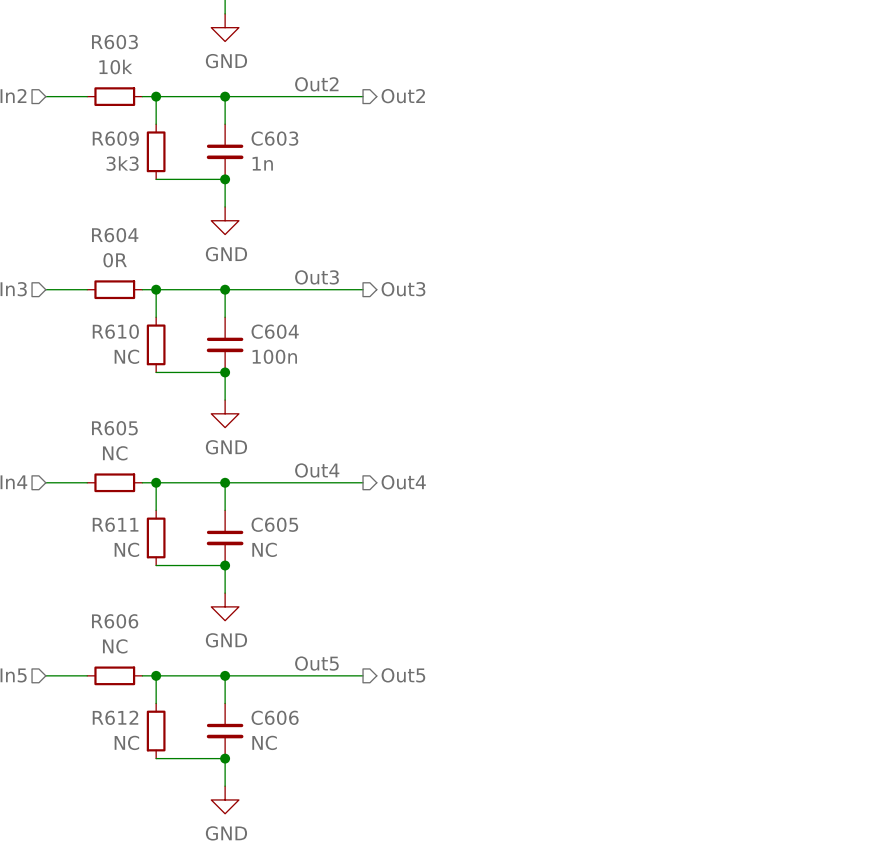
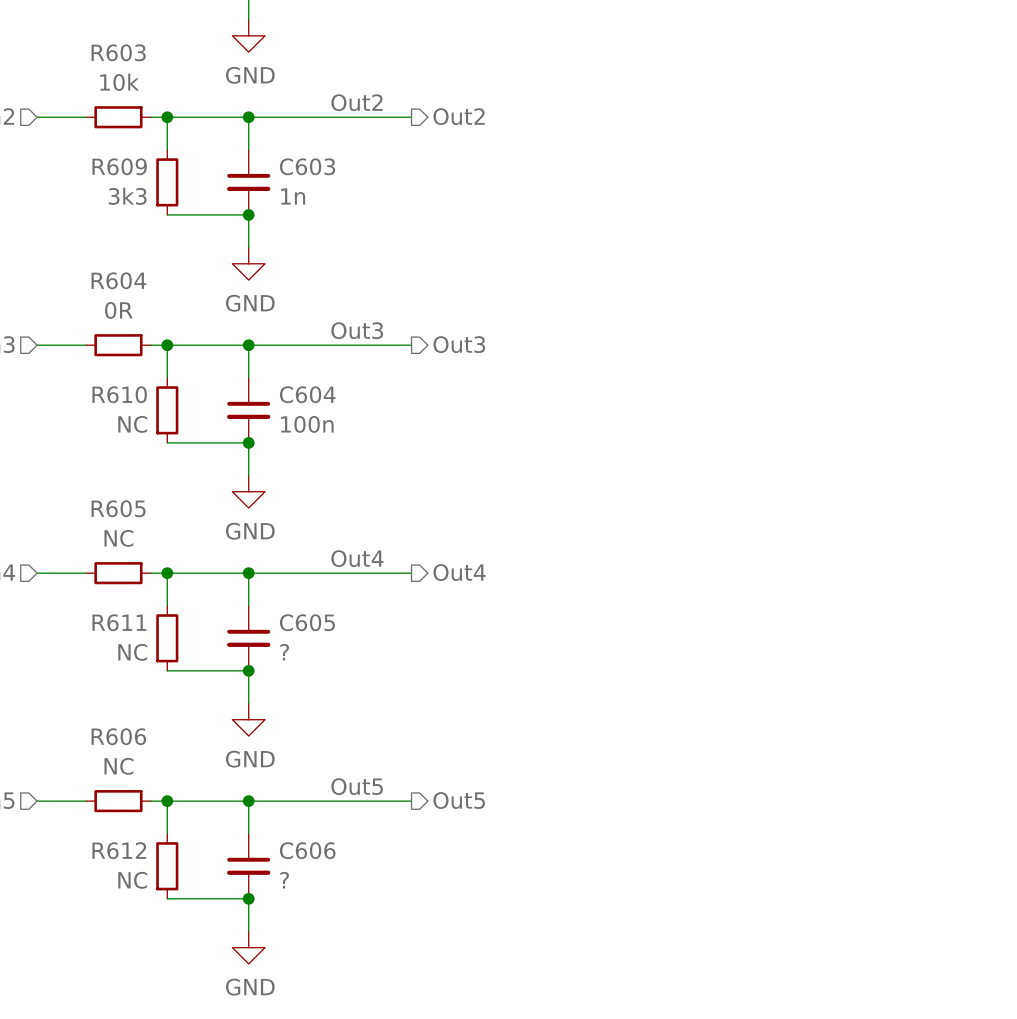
C605 value: NC (264, 549) -> ? (284, 652)
C606 value: NC (264, 742) -> ? (284, 880)

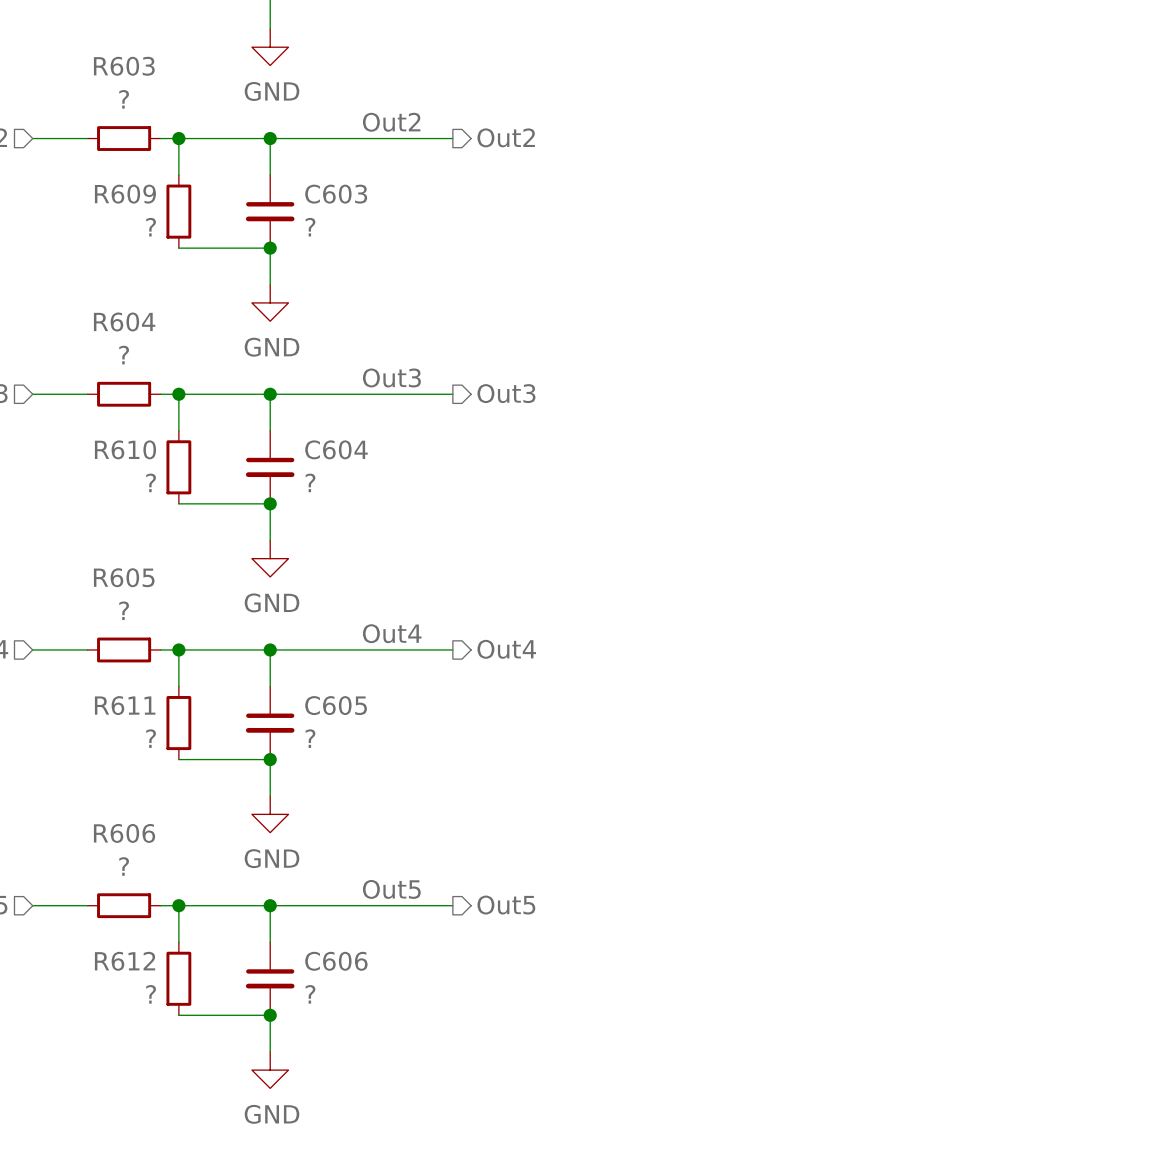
R603 value: 10k (119, 82) -> ? (124, 99)
R609 value: 3k3 (127, 196) -> ? (151, 227)
C603 value: 1n (293, 196) -> ? (310, 227)
R604 value: 0R (118, 310) -> ? (124, 355)
R610 value: NC (132, 424) -> ? (151, 482)
C604 value: 100n (307, 424) -> ? (310, 482)
R605 value: NC (118, 538) -> ? (124, 610)
R611 value: NC (132, 652) -> ? (151, 738)
R606 value: NC (118, 766) -> ? (124, 866)
R612 value: NC (132, 880) -> ? (151, 994)

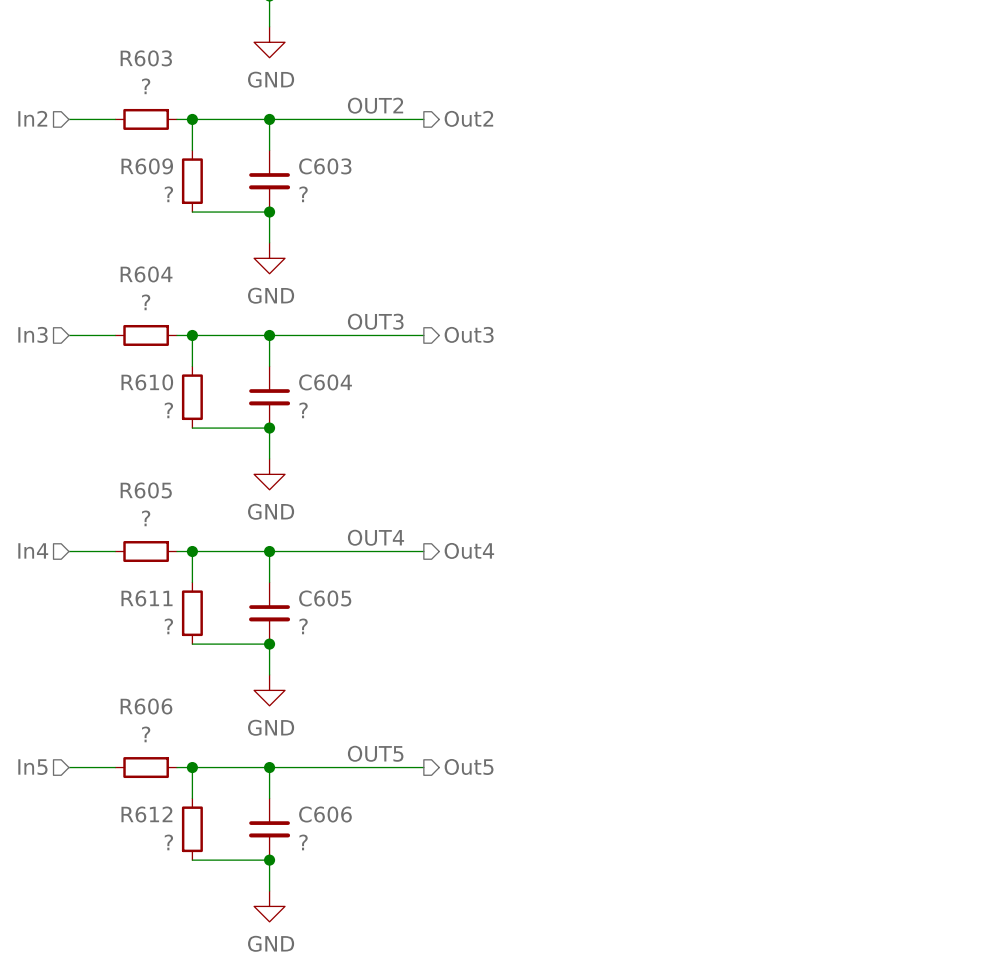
label: Out2 (391, 122) -> OUT2 (375, 105)
label: Out3 (391, 377) -> OUT3 (375, 321)
label: Out4 (392, 633) -> OUT4 (375, 537)
label: Out5 (391, 889) -> OUT5 (375, 753)

